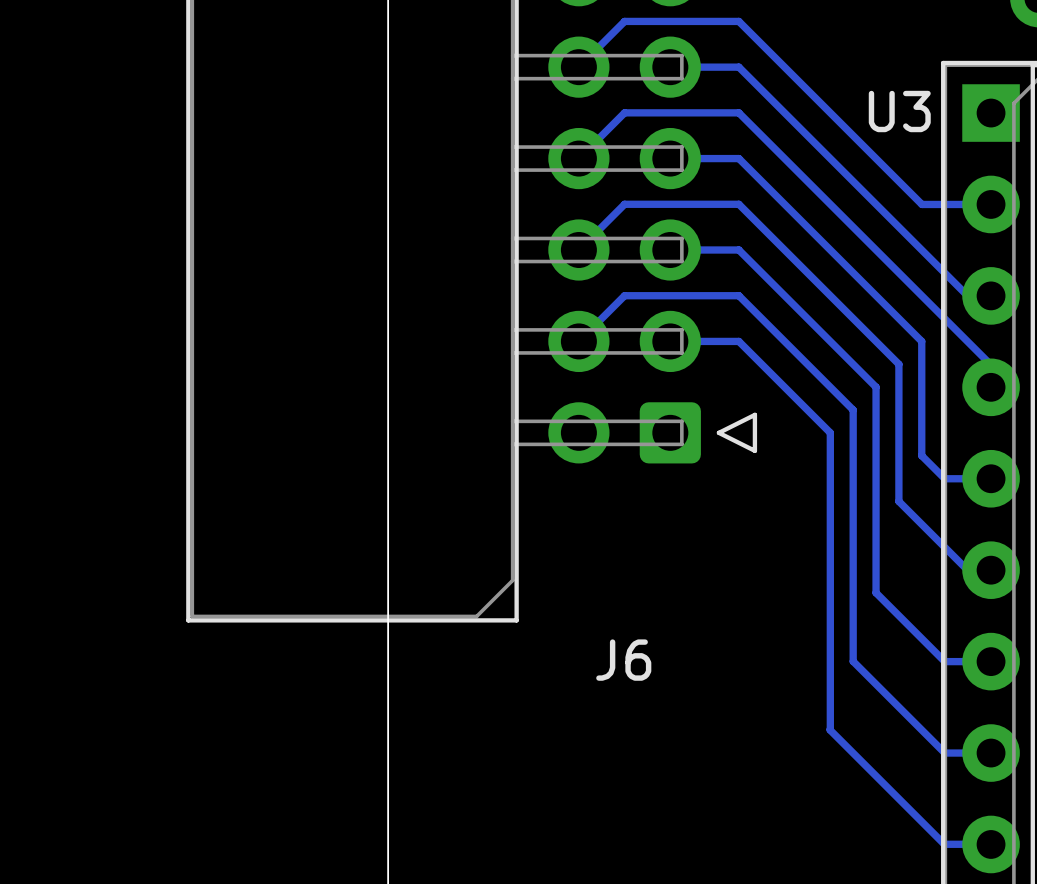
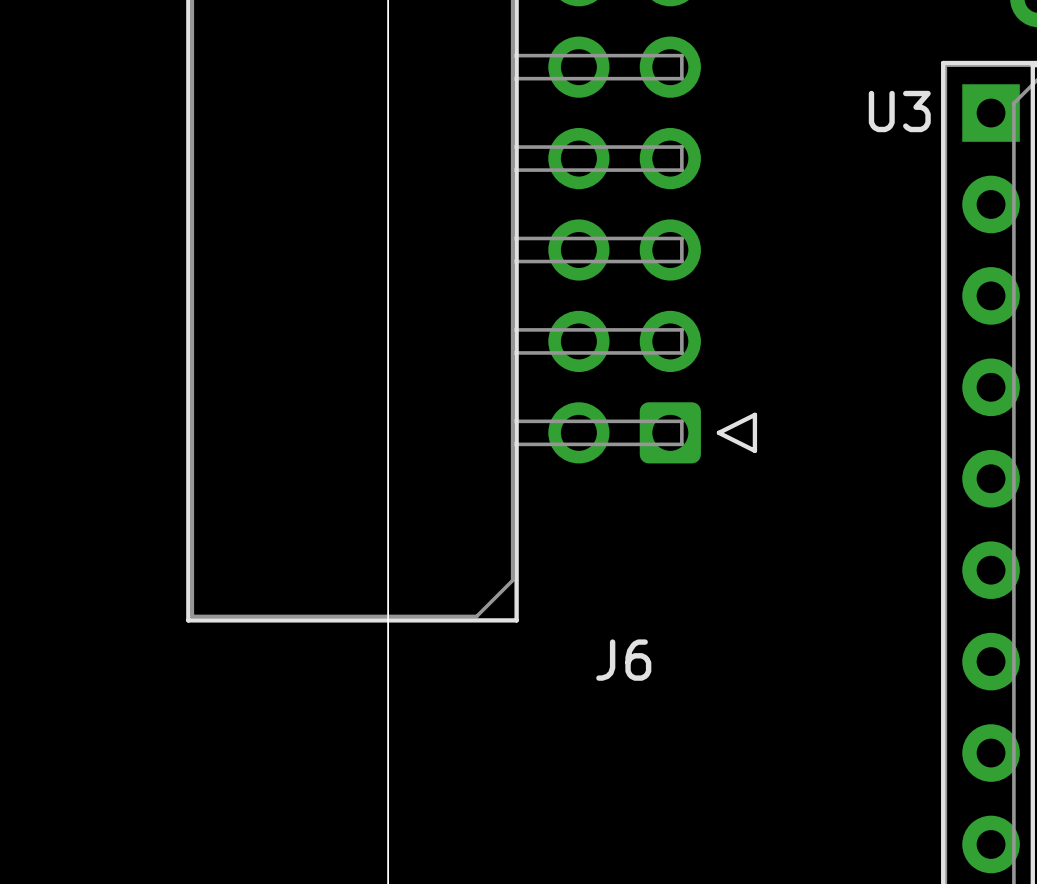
bottom track: (578, 67) (624, 21) (738, 21) (921, 204) (991, 204) -> none
bottom track: (670, 67) (738, 67) (967, 295) (991, 295) -> none
bottom track: (578, 158) (624, 112) (738, 112) (991, 365) (991, 387) -> none
bottom track: (670, 158) (738, 158) (921, 341) (921, 455) (944, 478) (991, 478) -> none
bottom track: (578, 250) (624, 204) (738, 204) (898, 364) (898, 501) (967, 570) (991, 570) -> none
bottom track: (670, 250) (738, 250) (876, 387) (876, 592) (944, 661) (991, 661) -> none
bottom track: (578, 341) (624, 295) (738, 295) (853, 410) (853, 661) (944, 753) (991, 753) -> none
bottom track: (670, 341) (738, 341) (830, 432) (830, 730) -> none
bottom track: (829, 729) (944, 844) (990, 844) -> none

